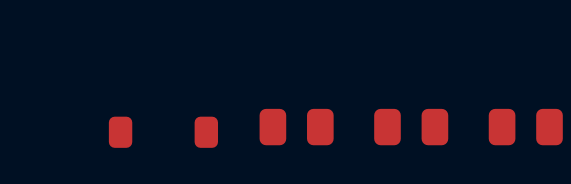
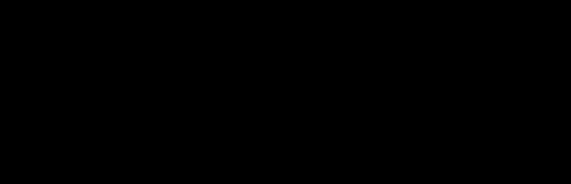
part: (296, 127) -> none
part: (411, 127) -> none
part: (525, 127) -> none
part: (163, 132) -> none

